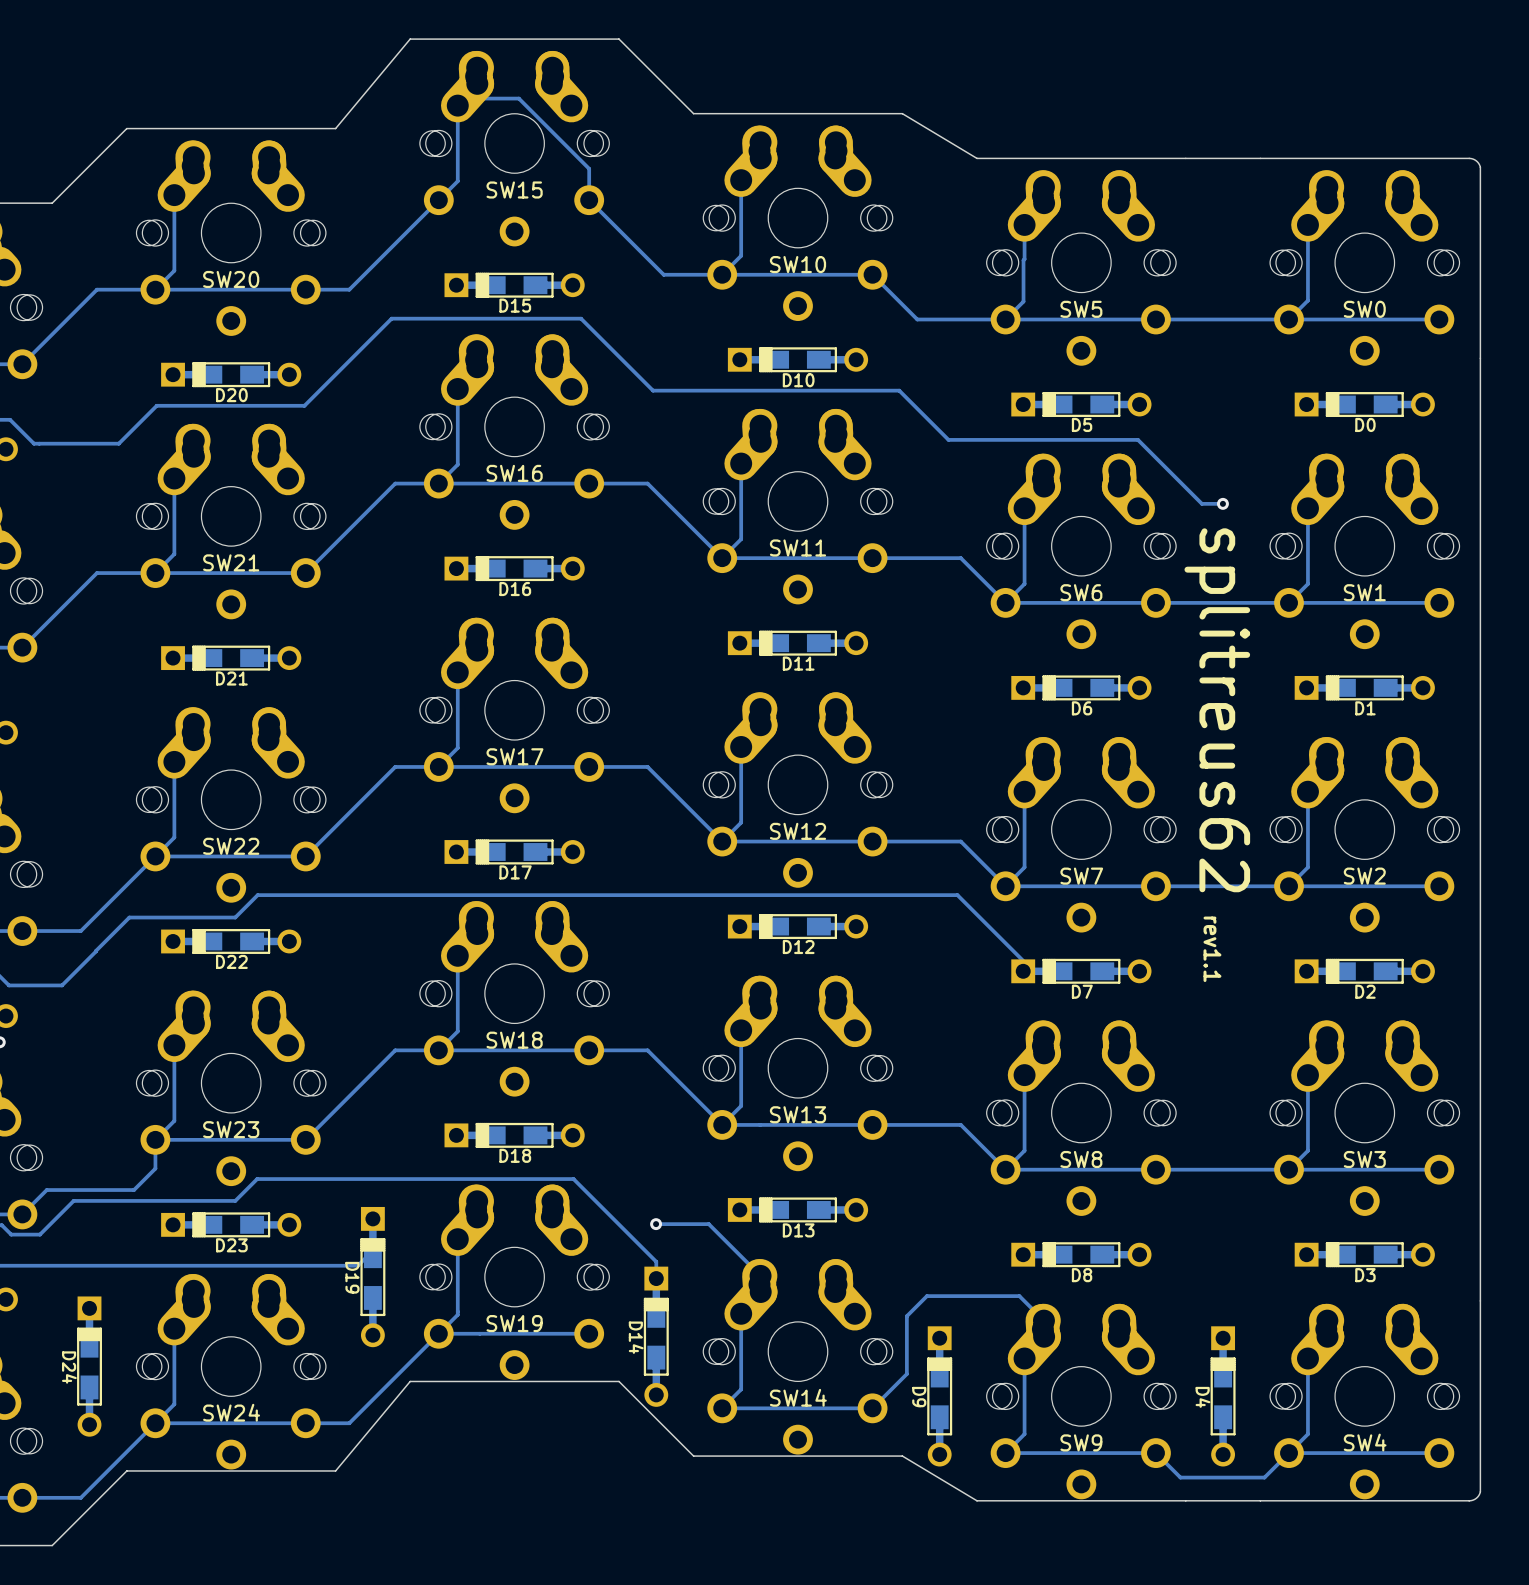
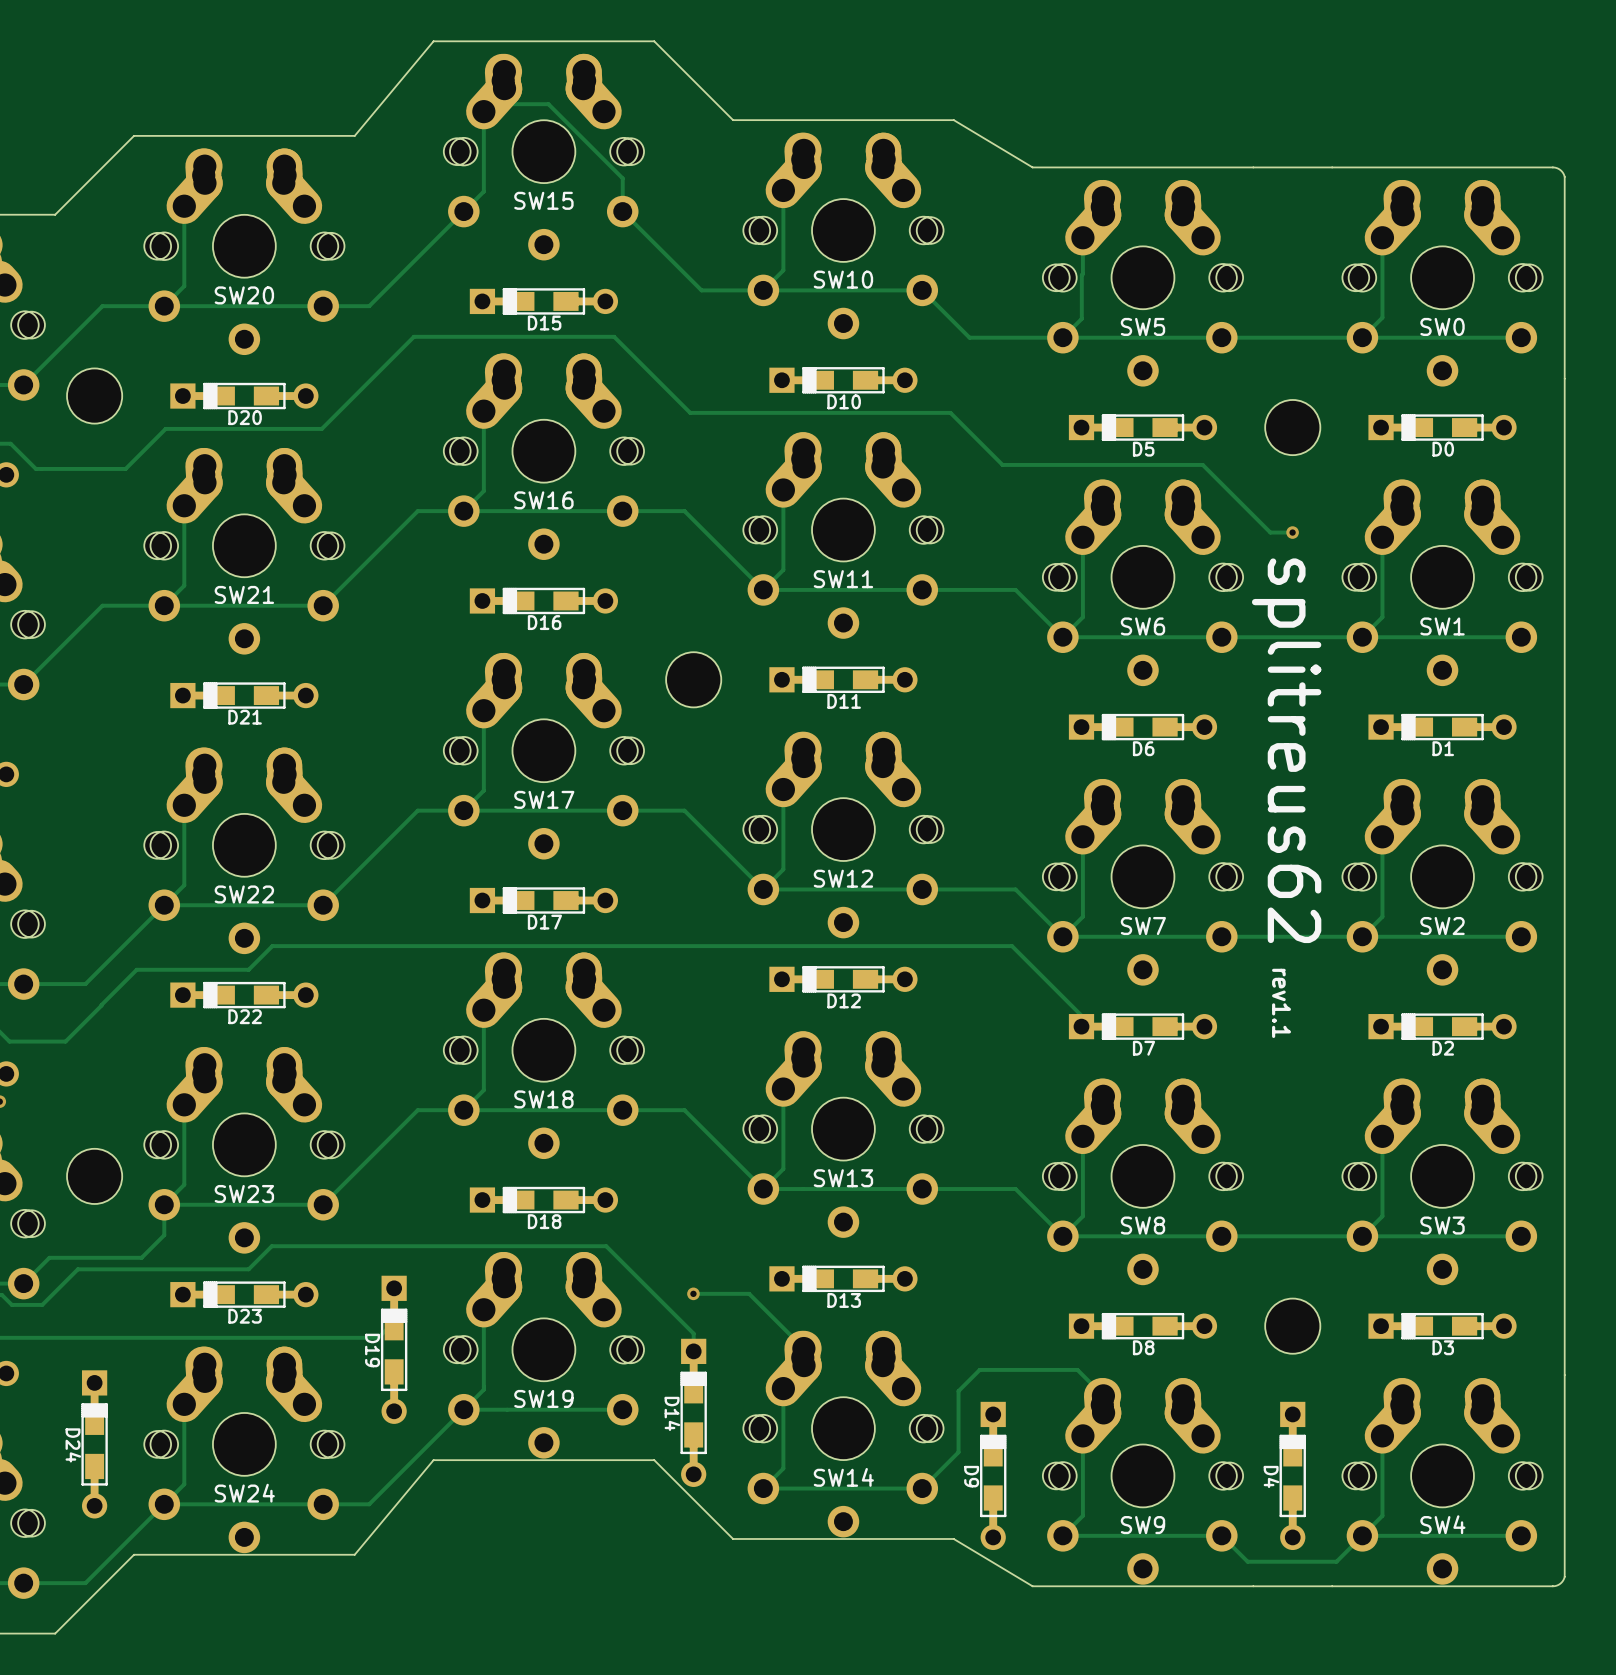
part: none -> (94, 396)
part: none -> (1292, 427)
part: none -> (693, 679)
part: none -> (94, 1176)
part: none -> (1292, 1326)

